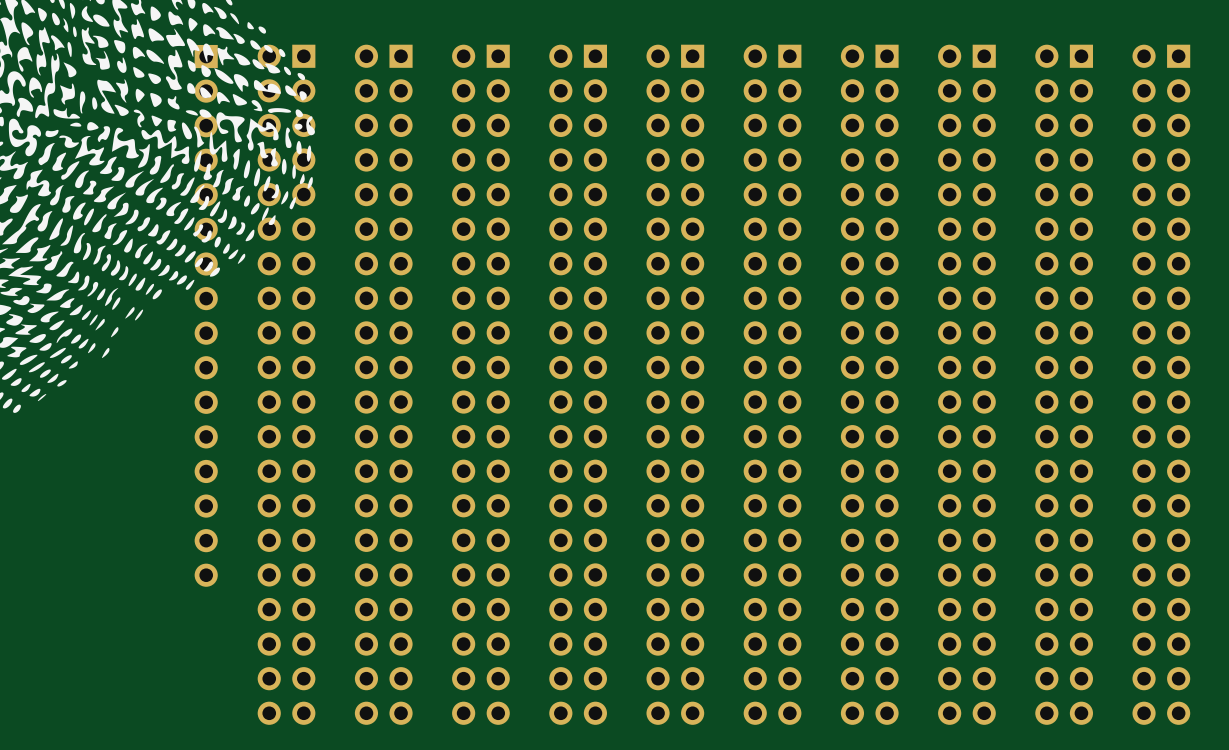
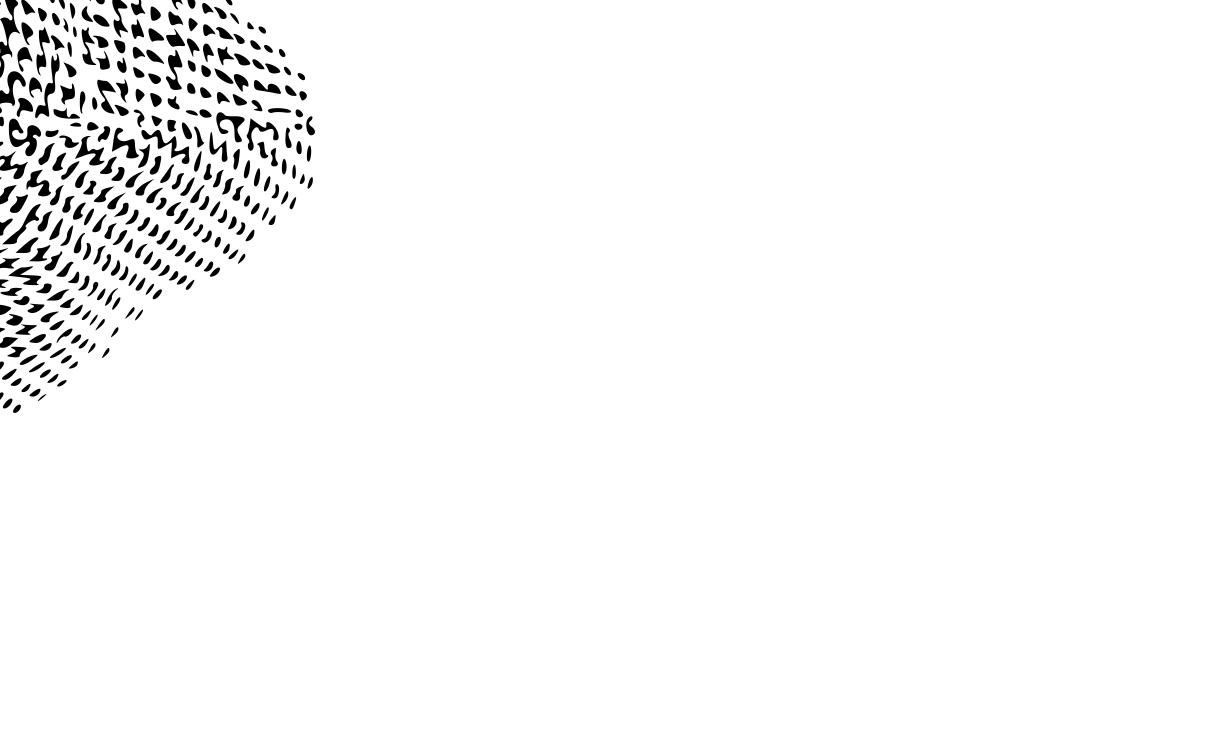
part: (206, 315) -> none
part: (286, 384) -> none
part: (383, 384) -> none
part: (480, 384) -> none
part: (578, 384) -> none
part: (675, 384) -> none
part: (772, 384) -> none
part: (869, 384) -> none
part: (966, 384) -> none
part: (1064, 384) -> none
part: (1161, 384) -> none

